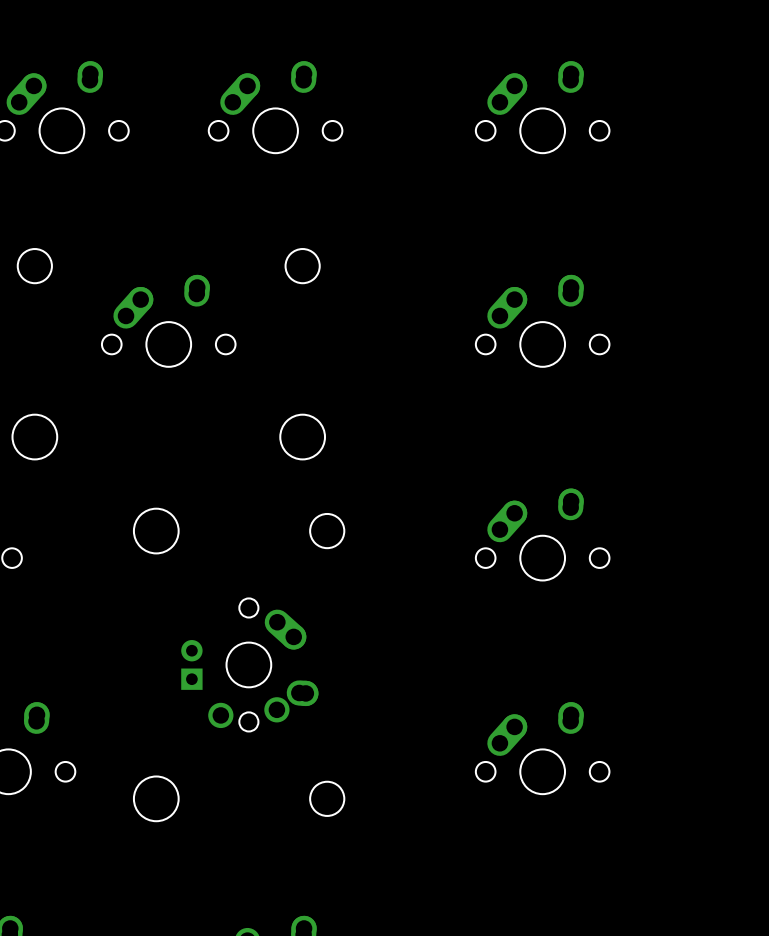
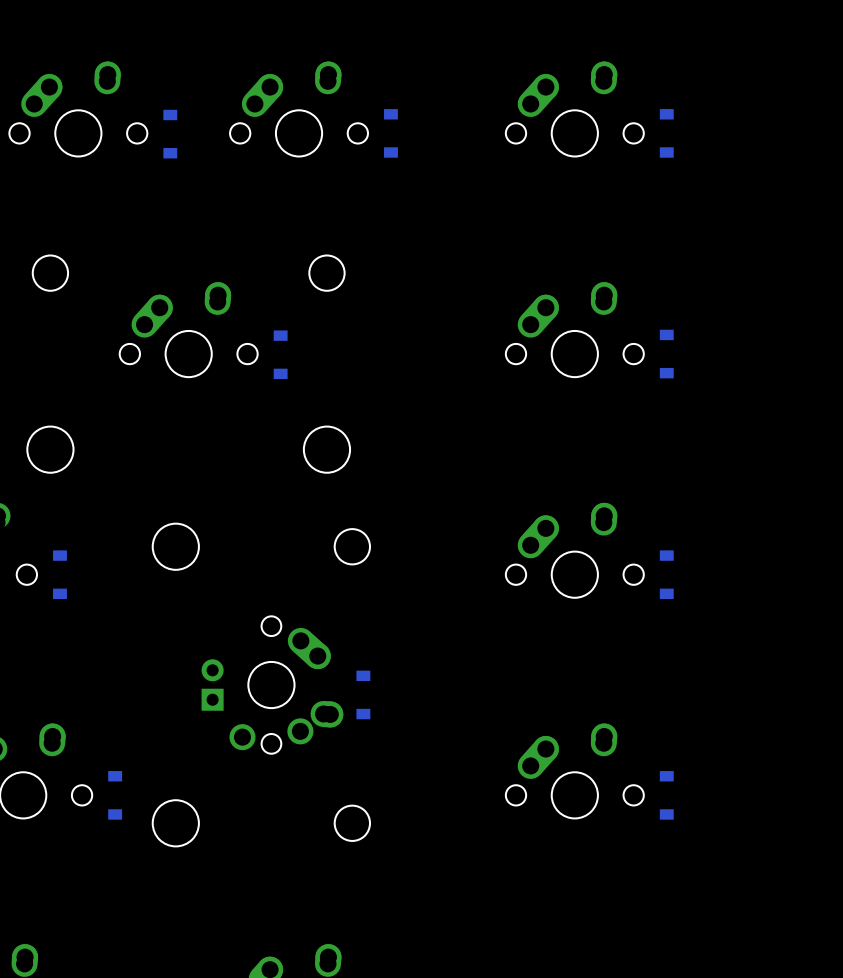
part: none -> (390, 133)
part: none -> (666, 133)
part: none -> (170, 134)
part: none -> (666, 354)
part: none -> (280, 354)
part: none -> (59, 574)
part: none -> (666, 574)
part: none -> (363, 694)
part: none -> (115, 795)
part: none -> (666, 795)

